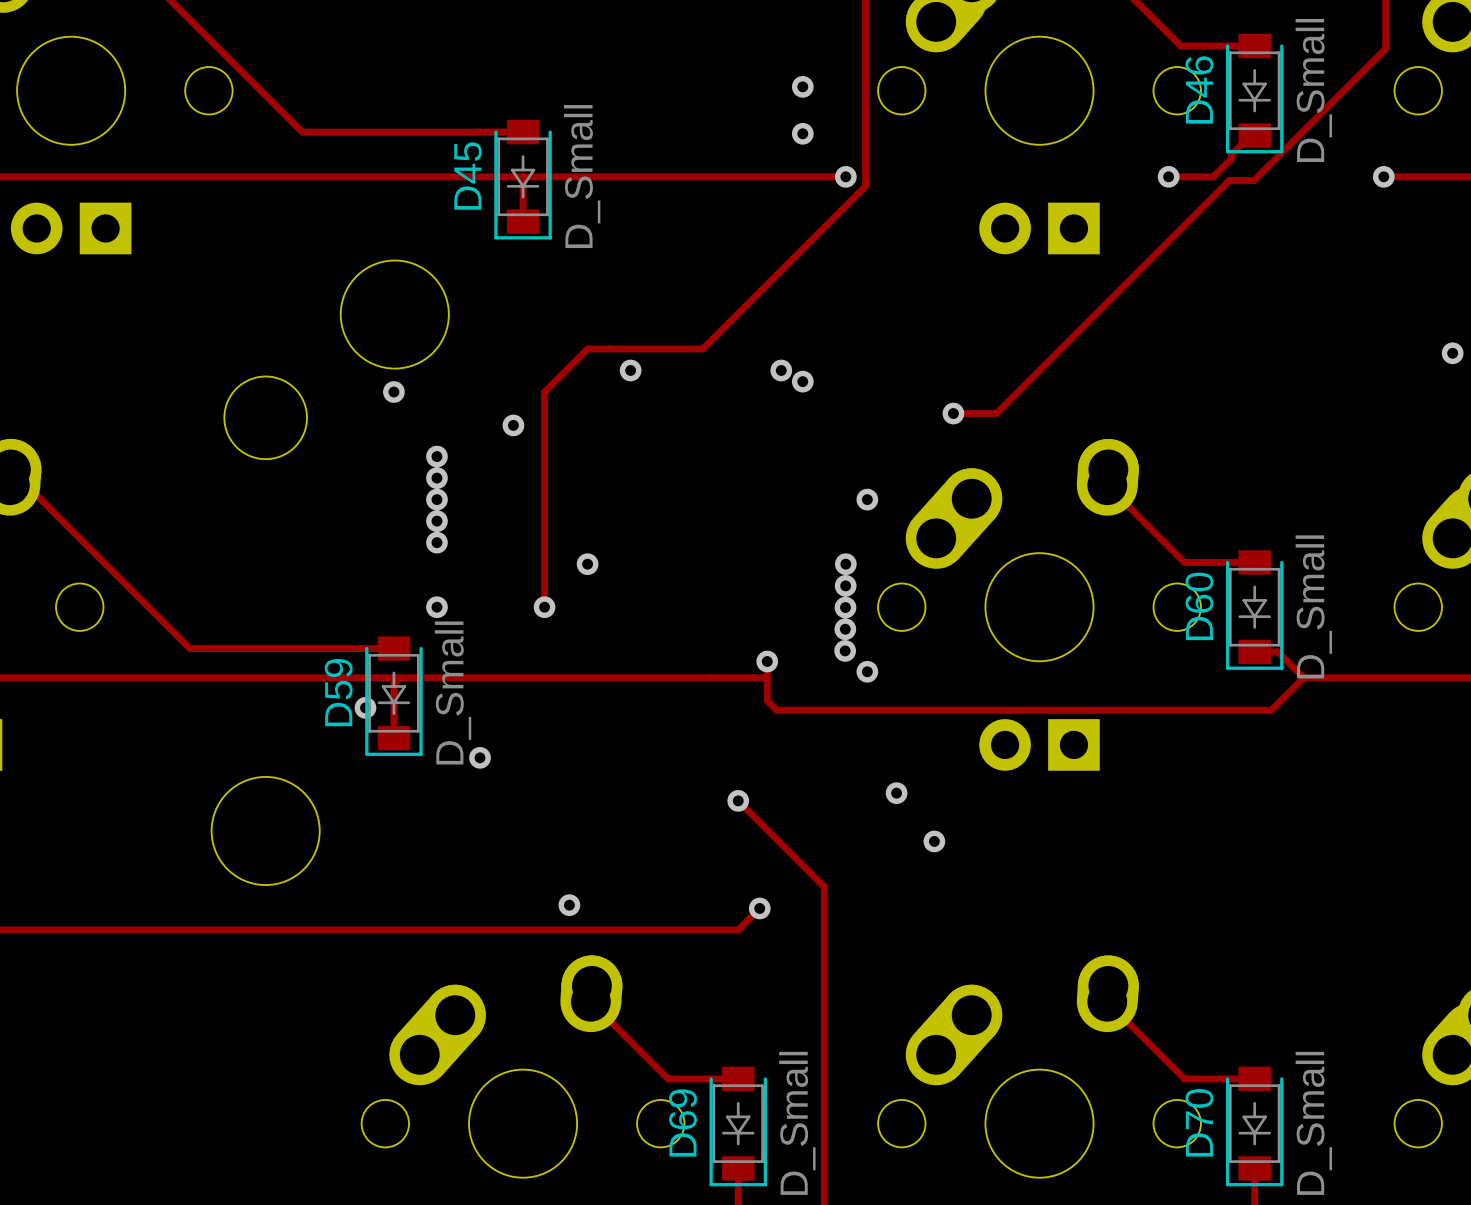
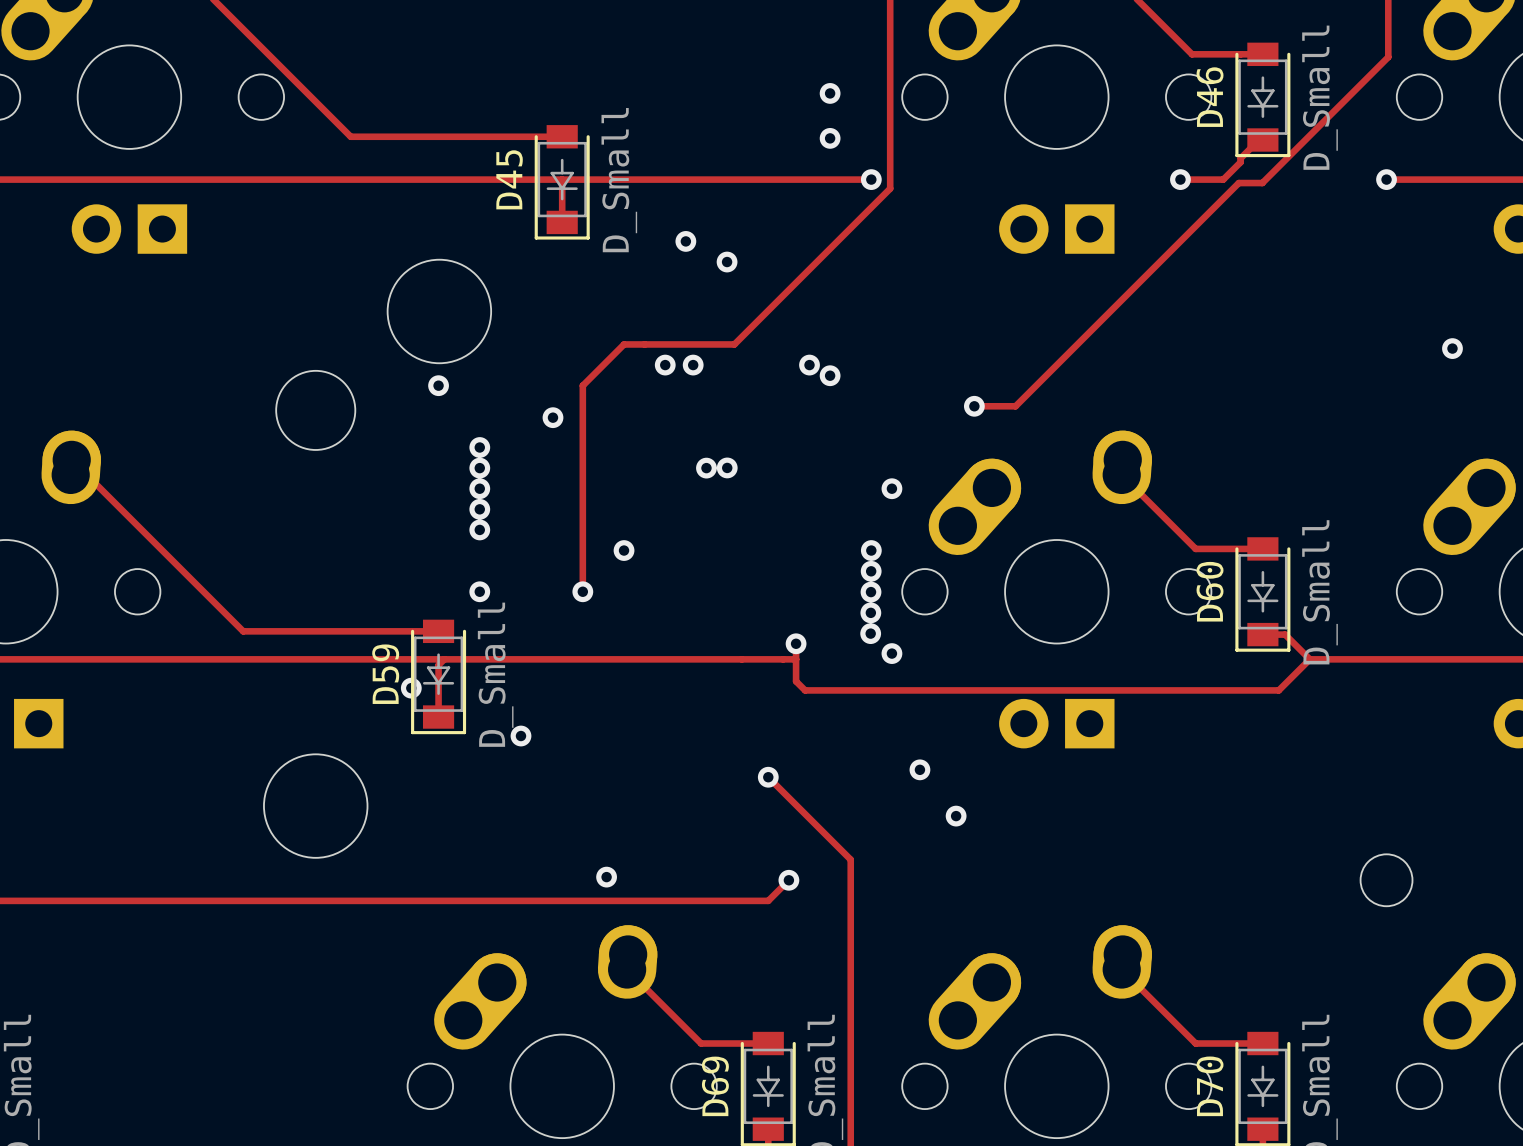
via: none -> (685, 241)
via: none -> (727, 262)
via: none -> (693, 365)
via: none -> (727, 467)
via: none -> (706, 468)
round board edge: none -> [1359, 853, 1414, 907]

